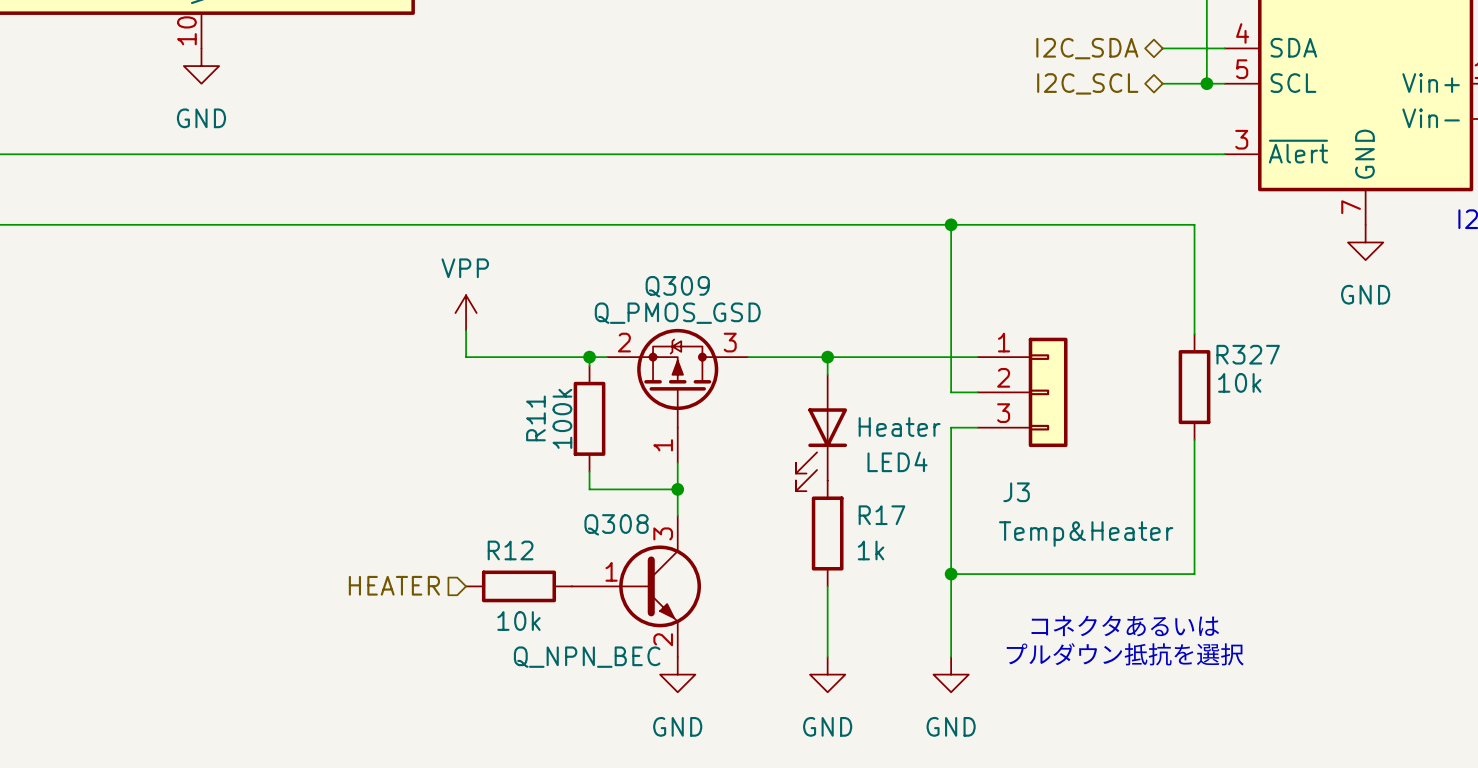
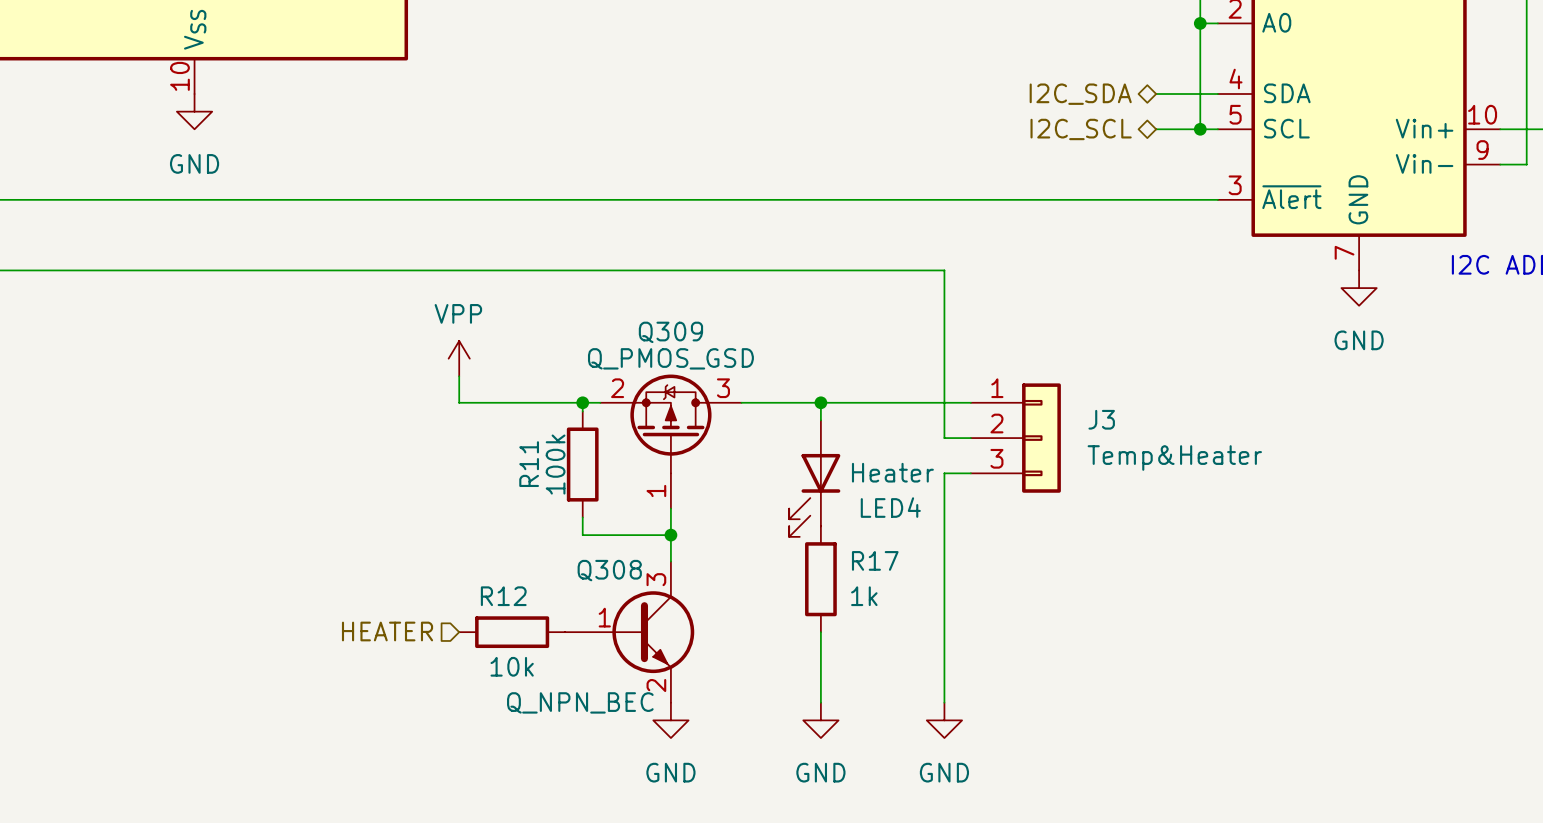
wire: (951, 224) (1194, 224) (1194, 334) -> none
junction: (951, 224) -> none
R327: 10k (1194, 387) -> none
wire: (1194, 440) (1194, 574) (951, 574) -> none
J3 name position: J3 (1016, 492) -> J3 (1101, 419)
J3 value position: Temp&Heater (1086, 534) -> Temp&Heater (1174, 457)
junction: (951, 574) -> none
text: コネクタあるいは (1125, 625) -> none
text: プルダウン抵抗を選択 (1125, 654) -> none

